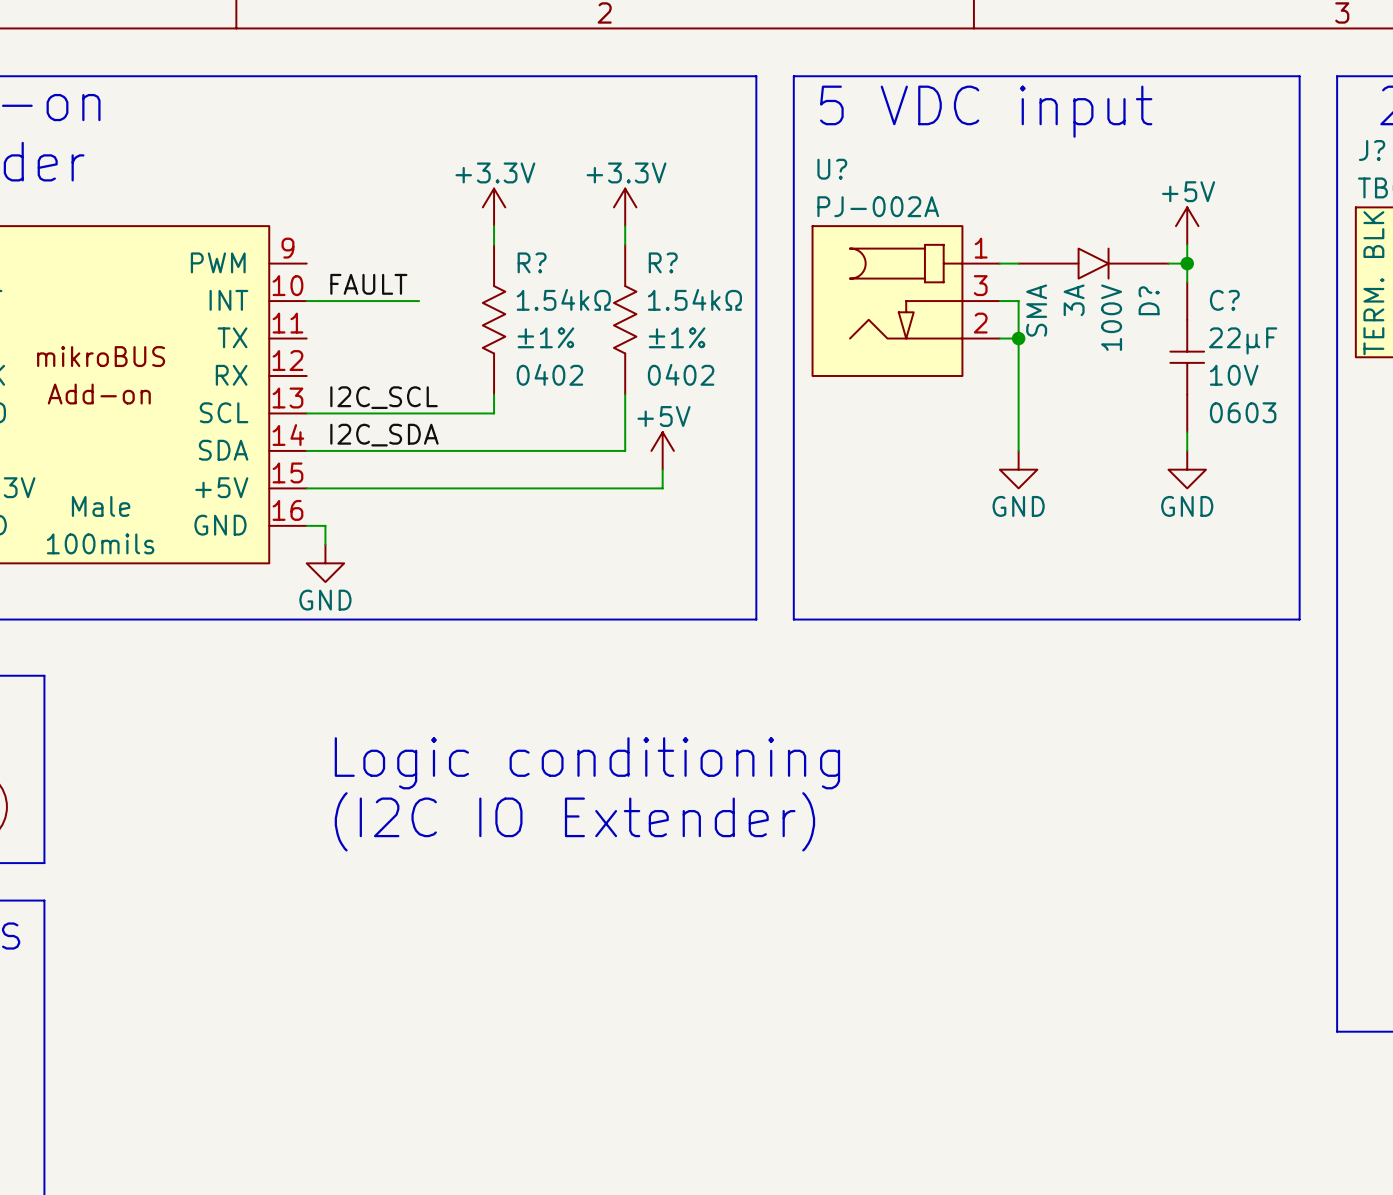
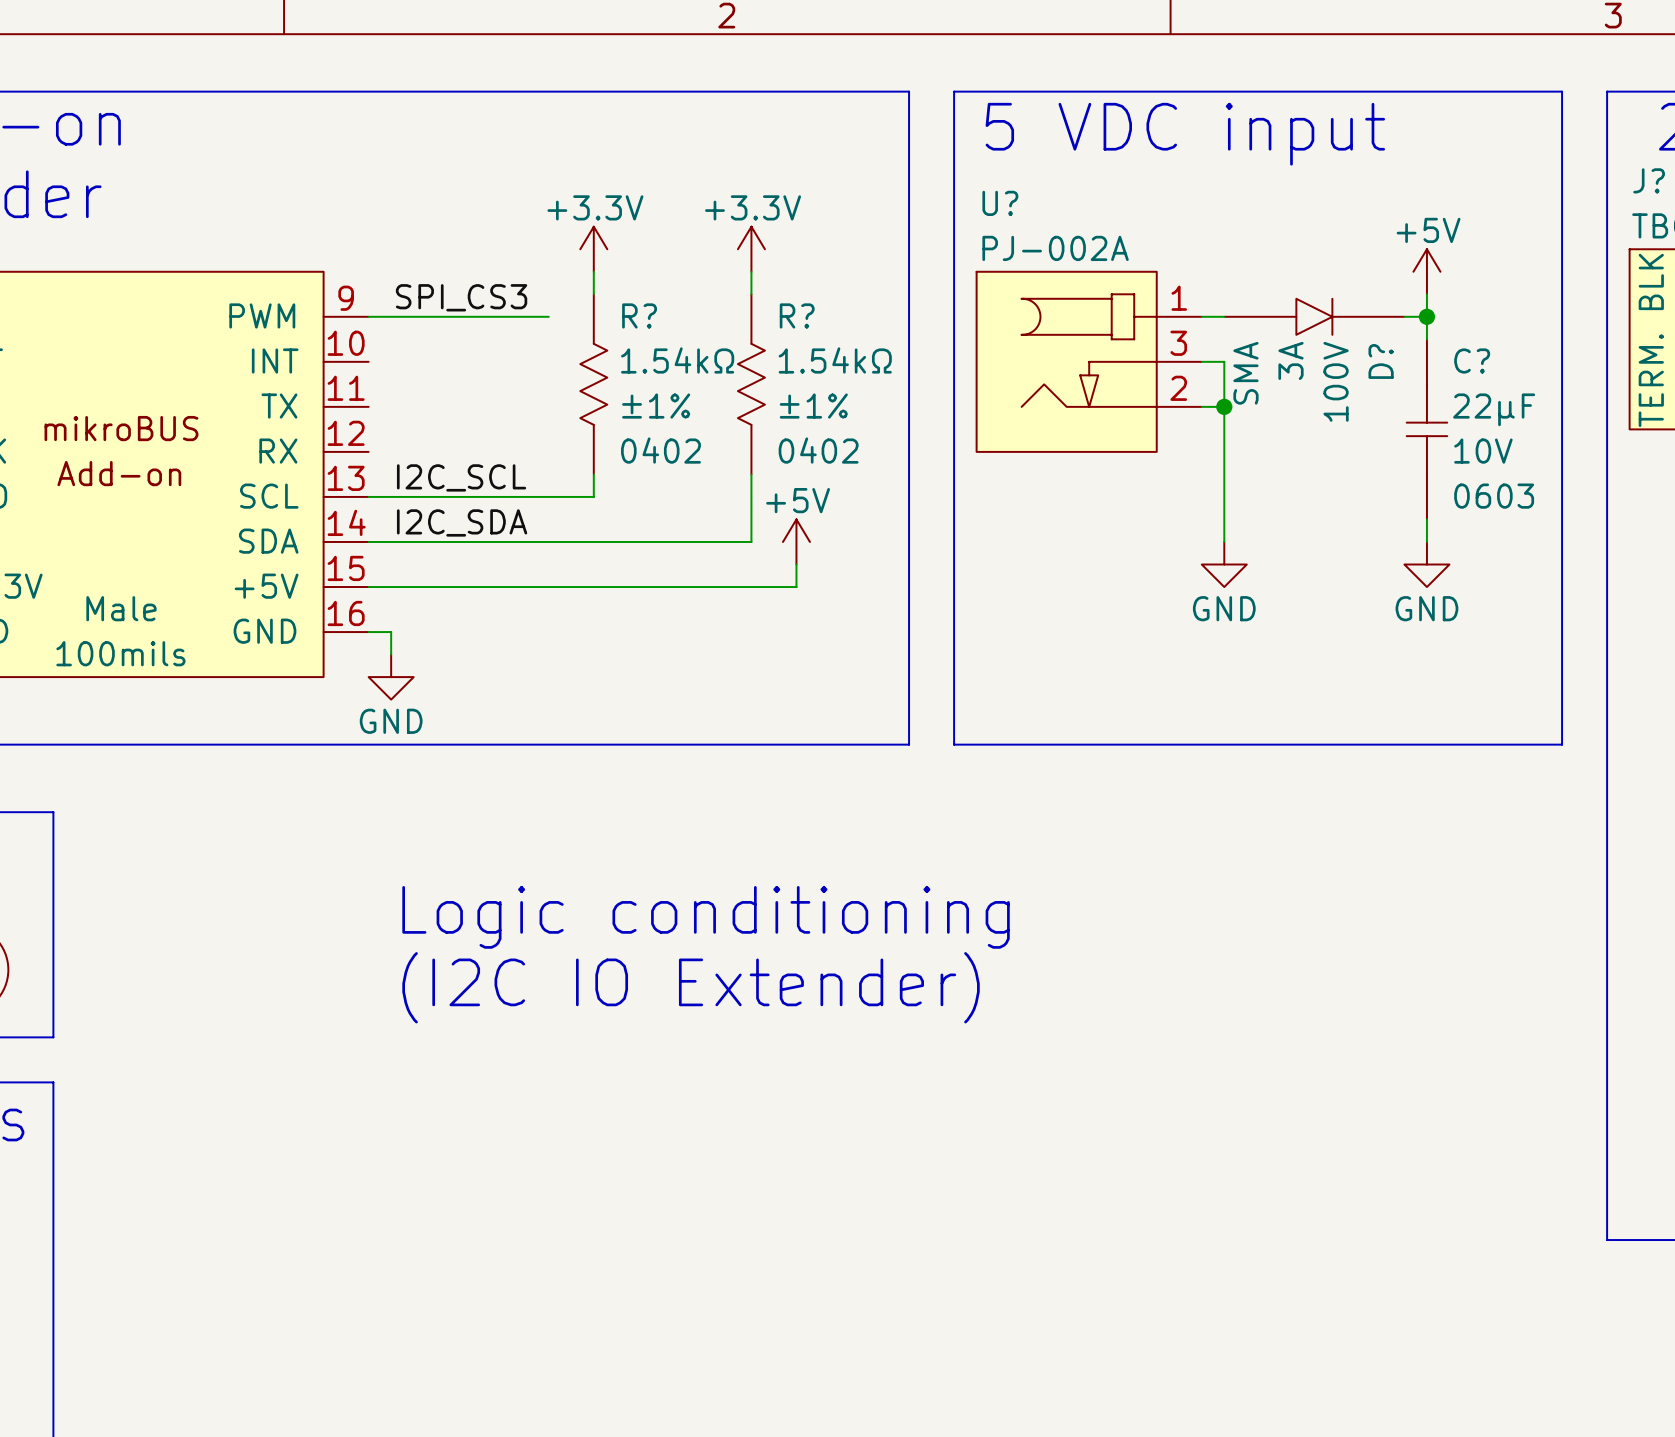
label: none -> SPI_CS3 (461, 297)
wire: none -> (368, 316) (548, 316)
label: FAULT (368, 284) -> none
wire: (306, 301) (419, 301) -> none

